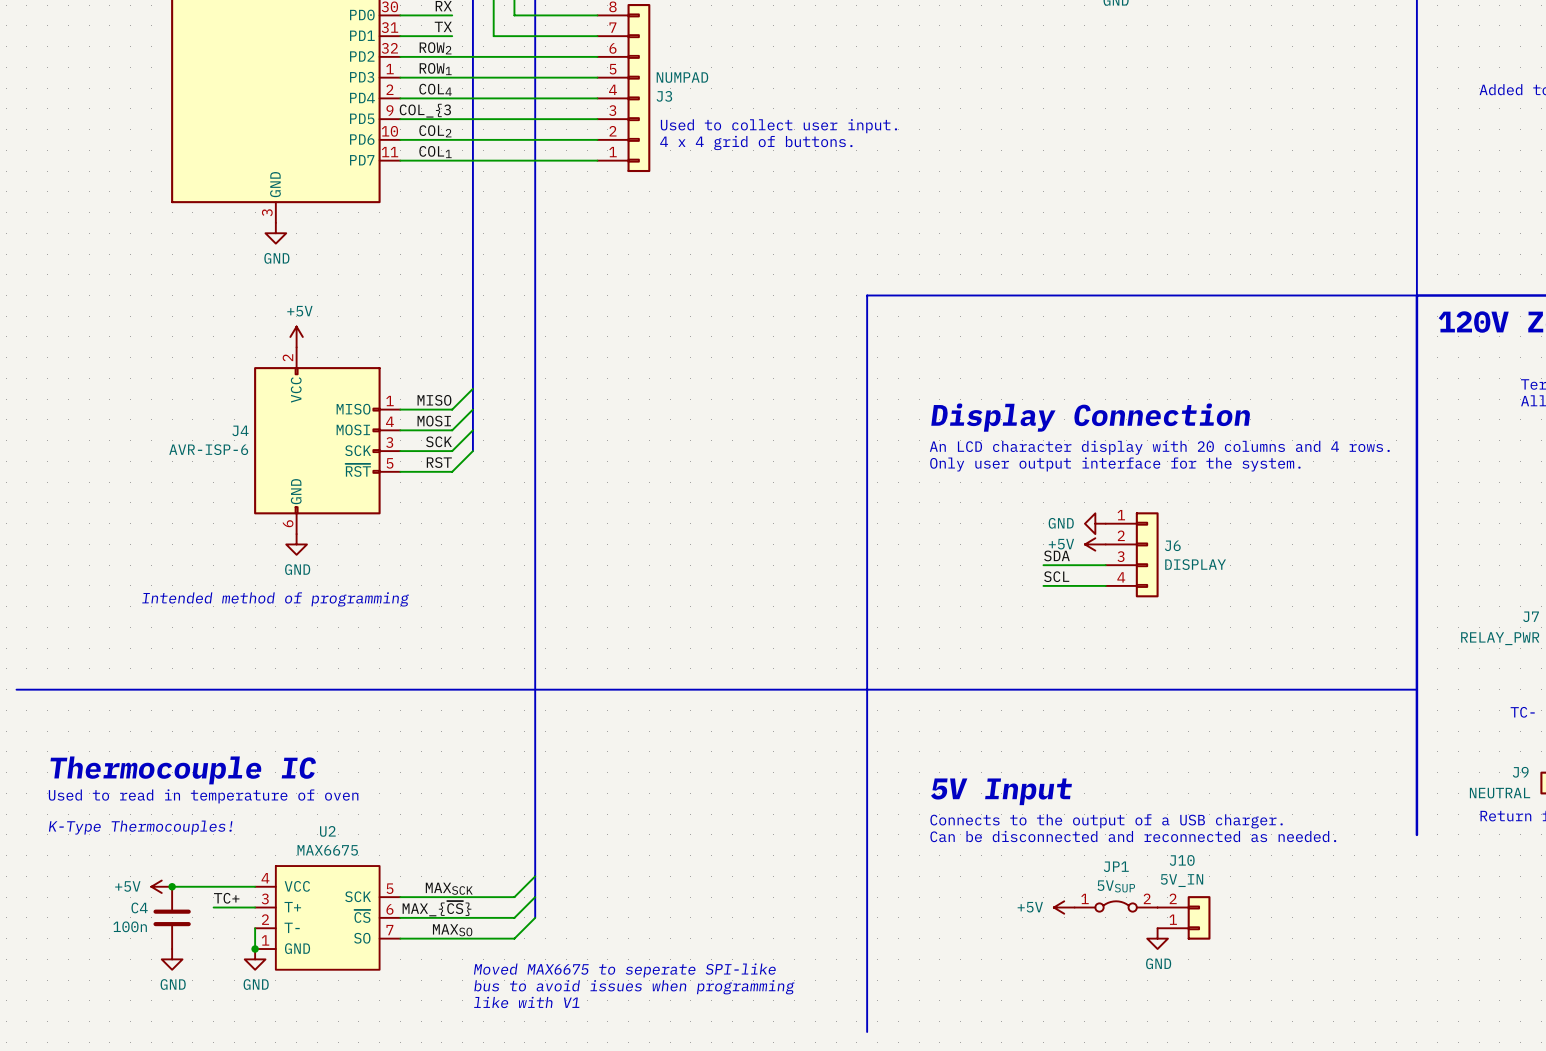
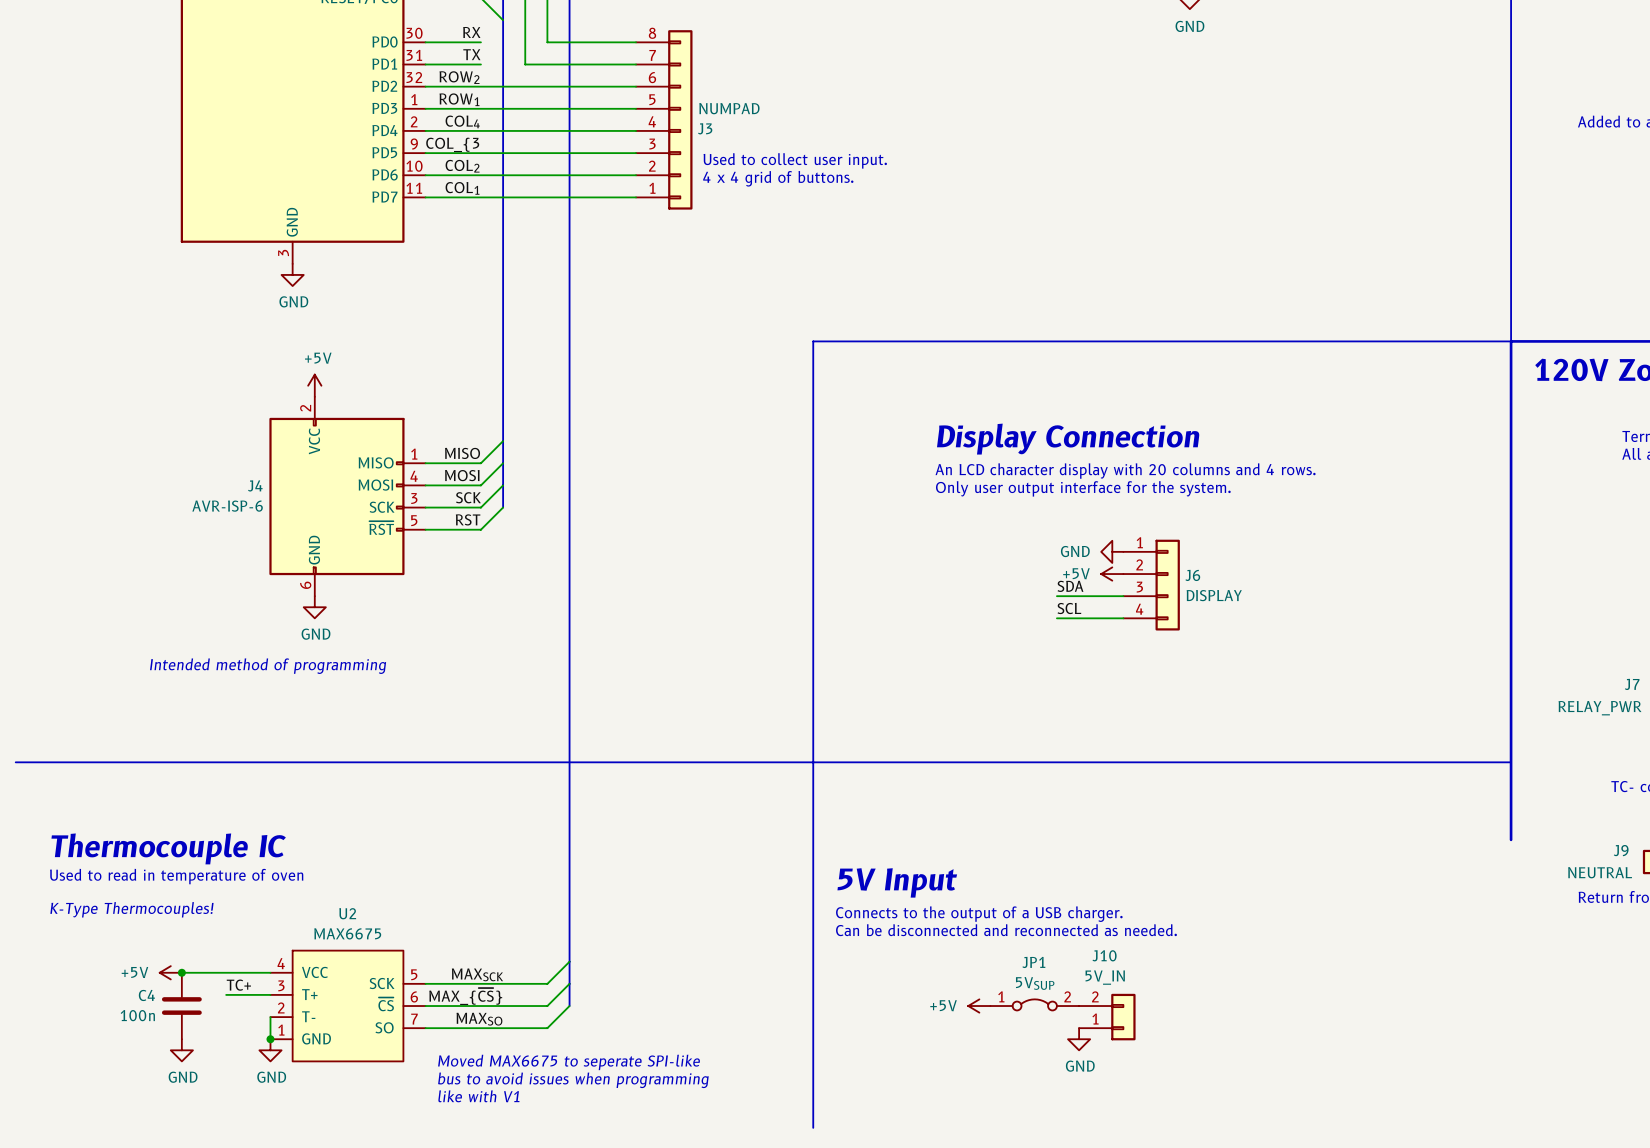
line: (867, 295) (867, 1031) -> (924, 341) (813, 341) (813, 1127)
text position: Display Connection (1090, 417) -> Display Connection (1068, 439)
text position: An LCD character display with 20 columns and 4 rows. (1159, 447) -> An LCD character display with 20 columns and 4 rows. (1125, 471)
text position: Only user output interface for the system. (1115, 464) -> Only user output interface for the system. (1083, 488)
power symbol position: GND (1095, 523) -> GND (1112, 551)
power symbol position: +5V (1095, 544) -> +5V (1112, 574)
J6 position: (1132, 554) -> (1151, 585)
label position: SDA (1056, 555) -> SDA (1070, 586)
wire: (1043, 565) (1105, 565) -> (1056, 596) (1123, 596)
label position: SCL (1056, 576) -> SCL (1069, 608)
wire: (1043, 585) (1105, 585) -> (1056, 618) (1123, 618)
line: (1416, 762) (1416, 834) -> none
text position: 5V Input (1001, 791) -> 5V Input (897, 882)
text position: Connects to the output of a USB charger. (1106, 821) -> Connects to the output of a USB charger. (979, 914)
text position: Can be disconnected and reconnected as needed. (1133, 836) -> Can be disconnected and reconnected as needed. (1006, 930)
JP1 position: (1116, 906) -> (1034, 1004)
power symbol position: +5V (1064, 907) -> +5V (979, 1006)
J10 position: (1184, 917) -> (1107, 1017)
power symbol position: GND (1157, 938) -> GND (1079, 1039)
text position: Moved MAX6675 to seperate SPI-like (624, 970) -> Moved MAX6675 to seperate SPI-like (569, 1062)
text position: bus to avoid issues when programming (634, 987) -> bus to avoid issues when programming (573, 1080)
text position: like with V1 (526, 1002) -> like with V1 (478, 1096)

